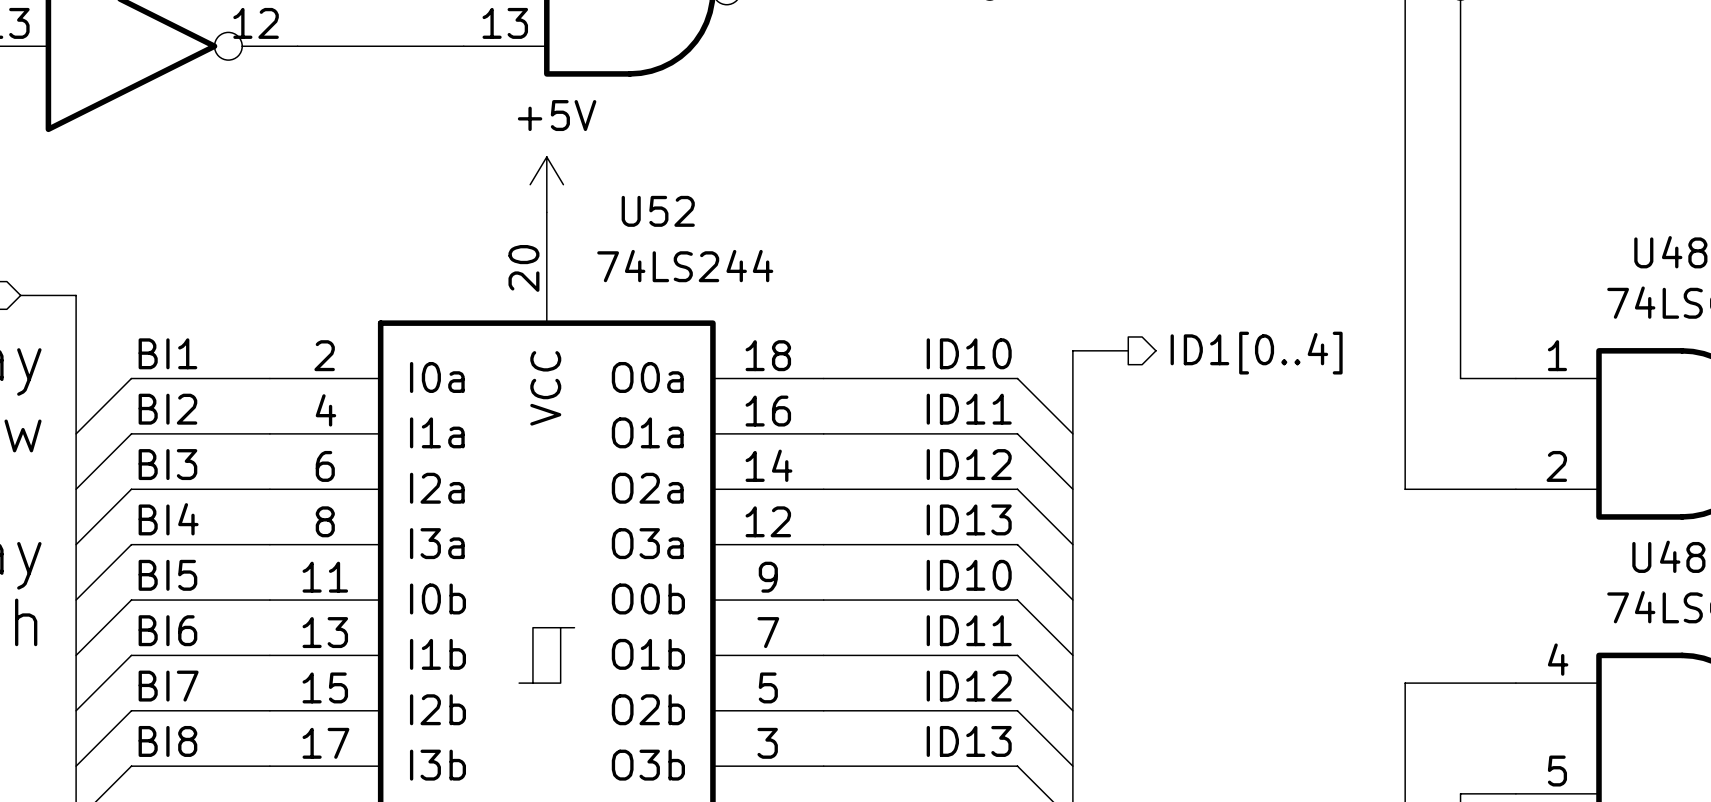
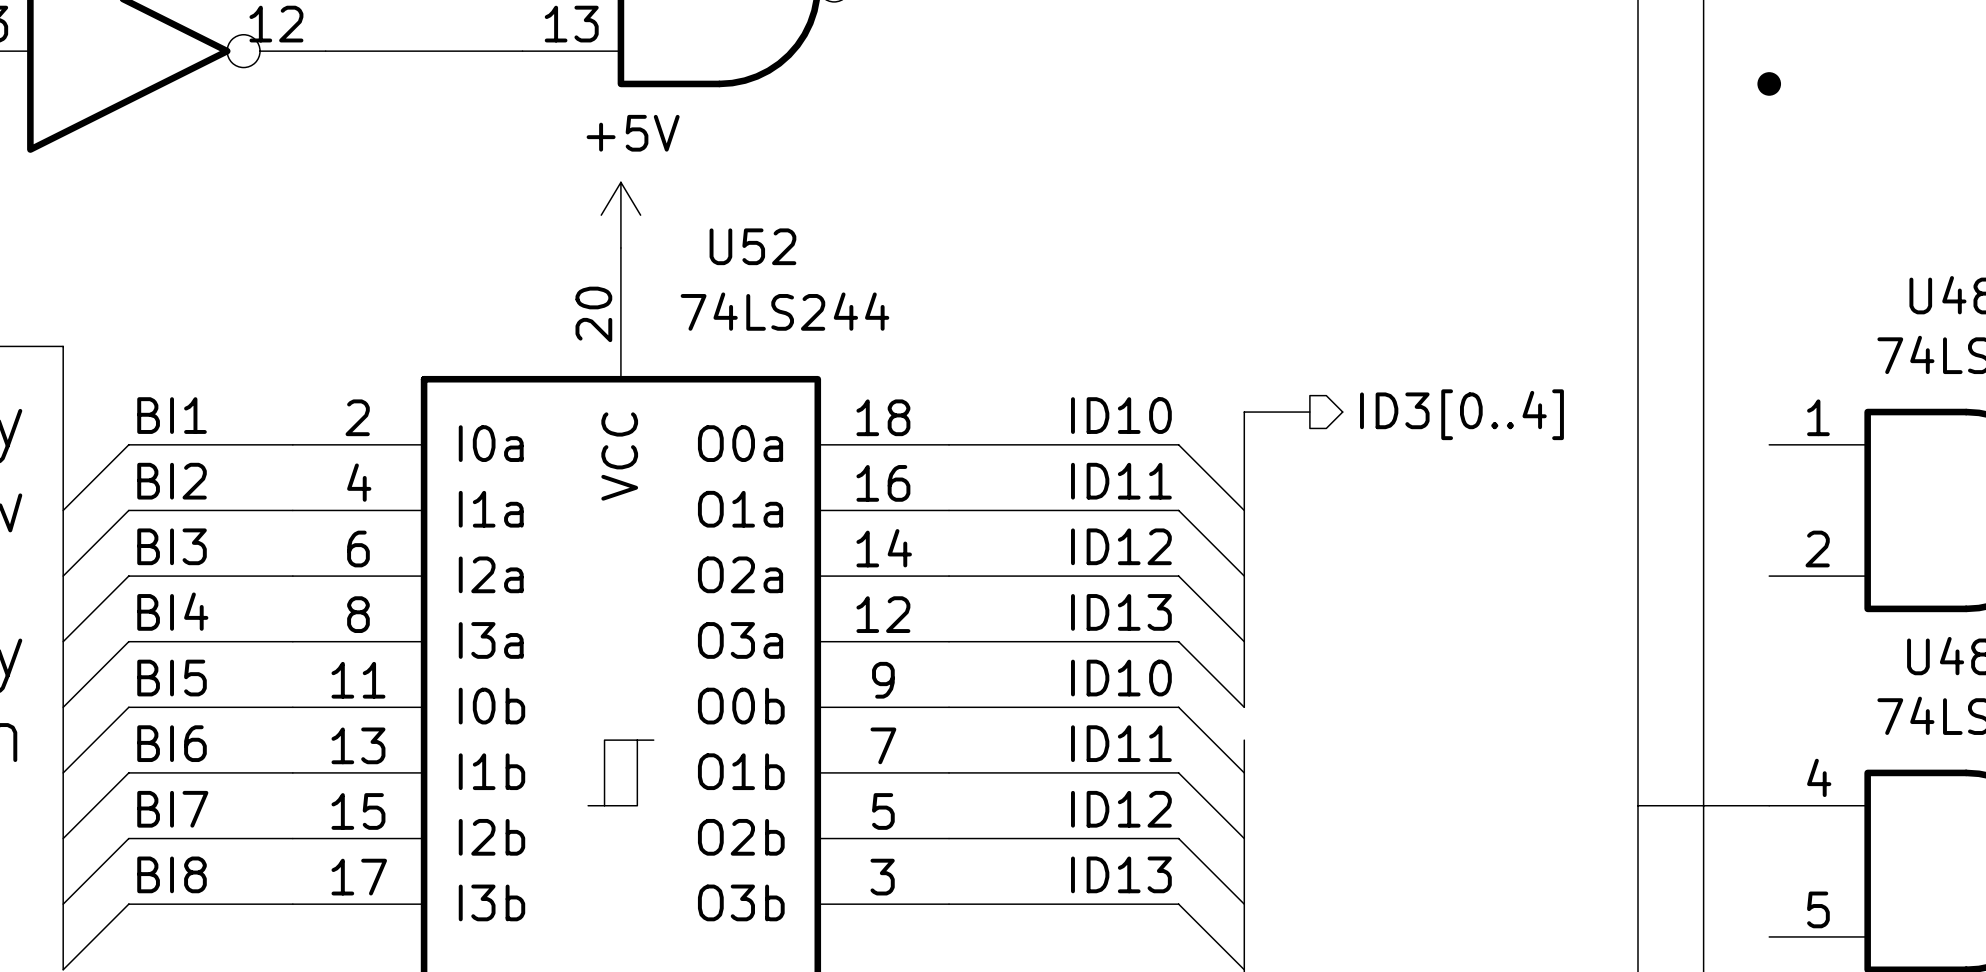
junction: none -> (1769, 83)
hierarchical label: ID1[0..4] (1256, 353) -> ID3[0..4] (1461, 414)
wire: (1460, 378) (1515, 378) -> (1703, 444) (1703, 936)
wire: (1405, 489) (1515, 489) -> (1637, 576) (1637, 805)
bus: (1072, 600) (1072, 627) -> none
wire: (1460, 793) (1515, 793) -> none

